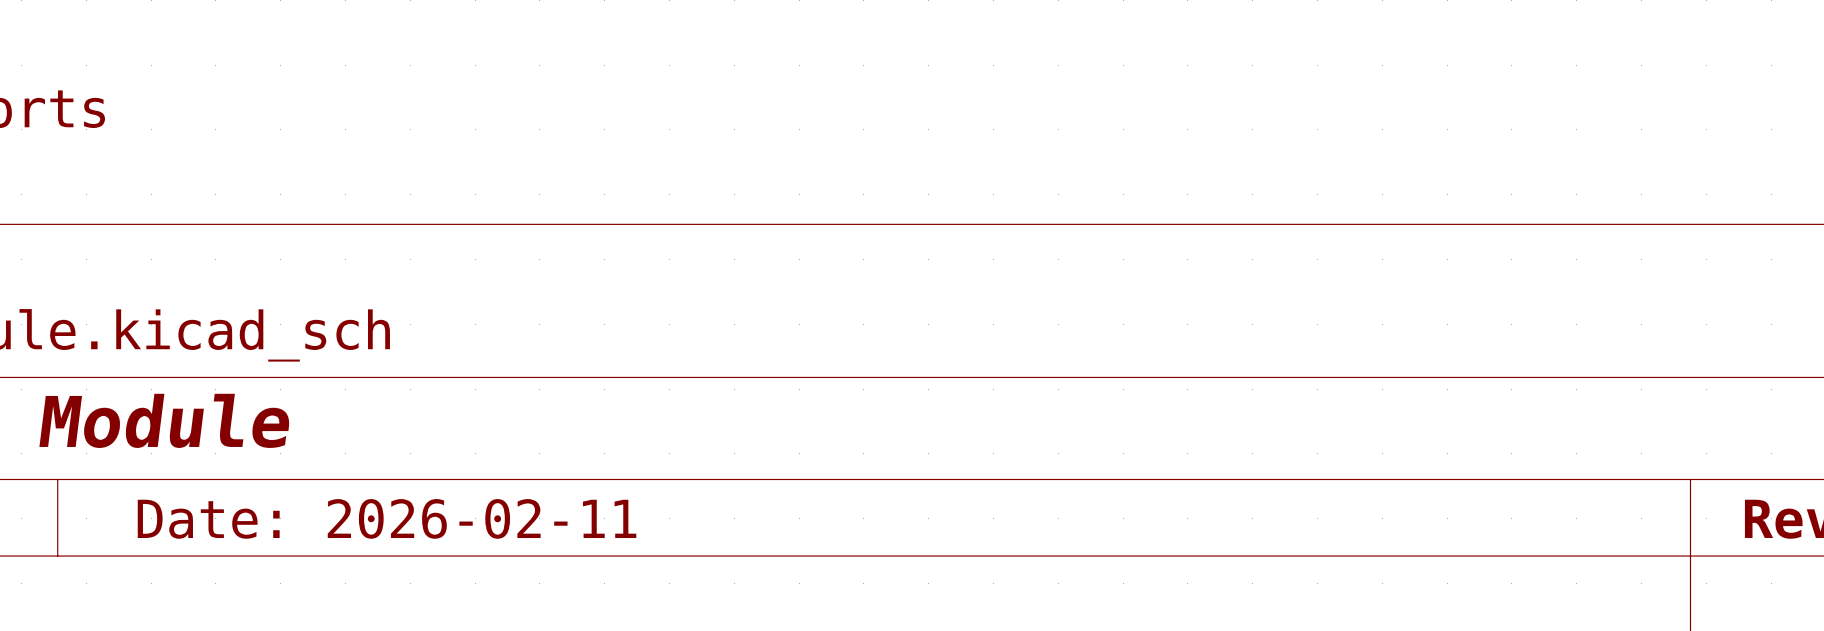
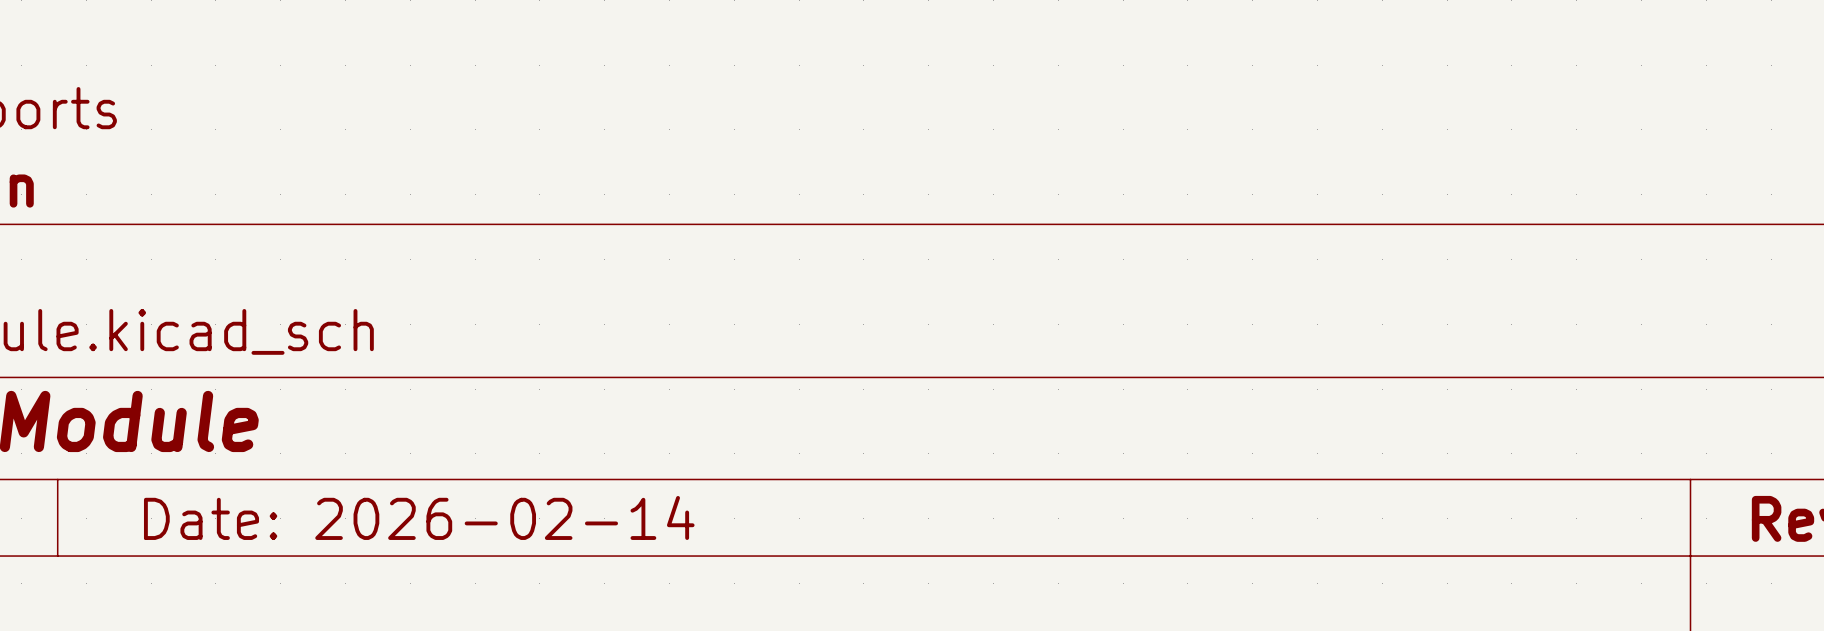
title block: Date: 2026-02-11 (387, 518) -> Date: 2026-02-14 (419, 517)

